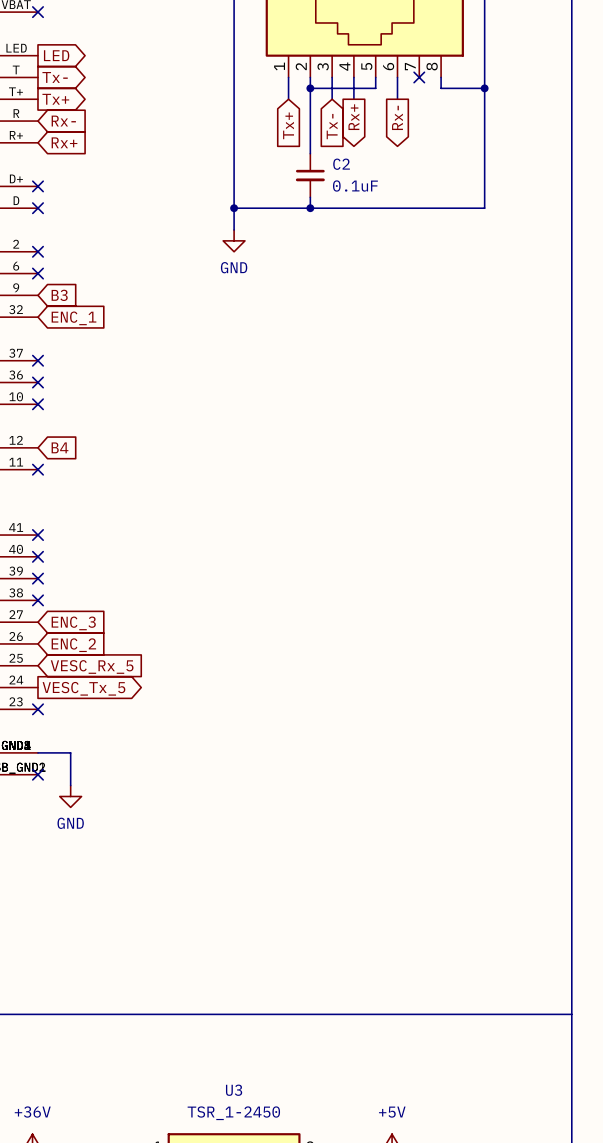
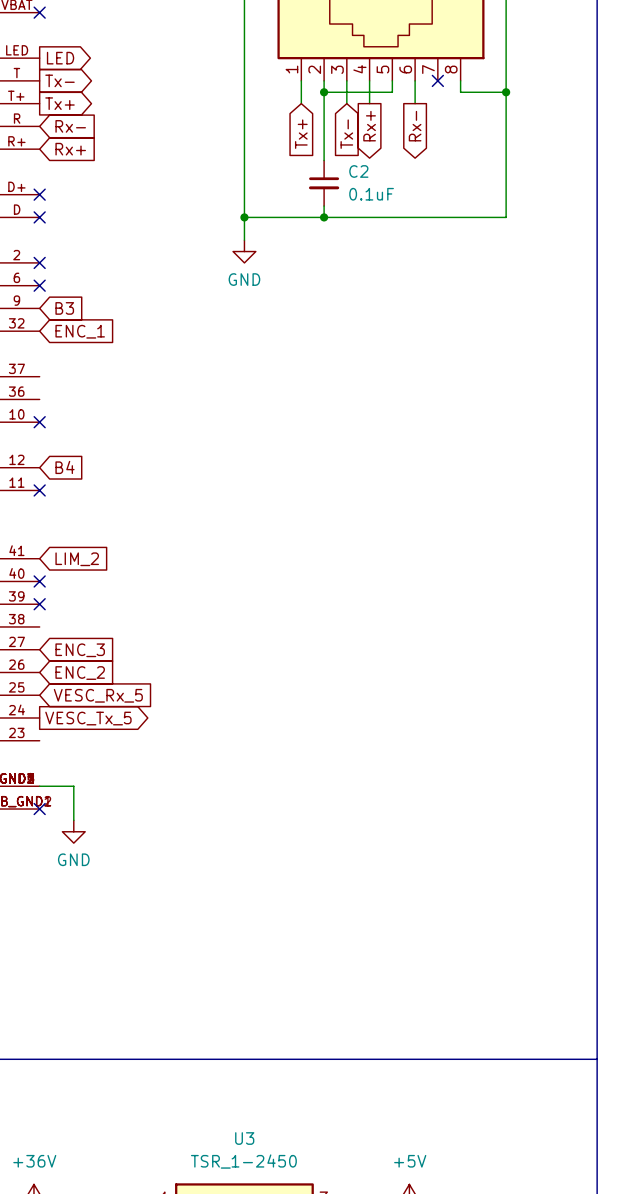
no-connect mark: (37, 360) -> none
no-connect mark: (37, 382) -> none
no-connect mark: (37, 535) -> none
global label: none -> LIM_2 (77, 559)
no-connect mark: (37, 600) -> none
no-connect mark: (37, 709) -> none

